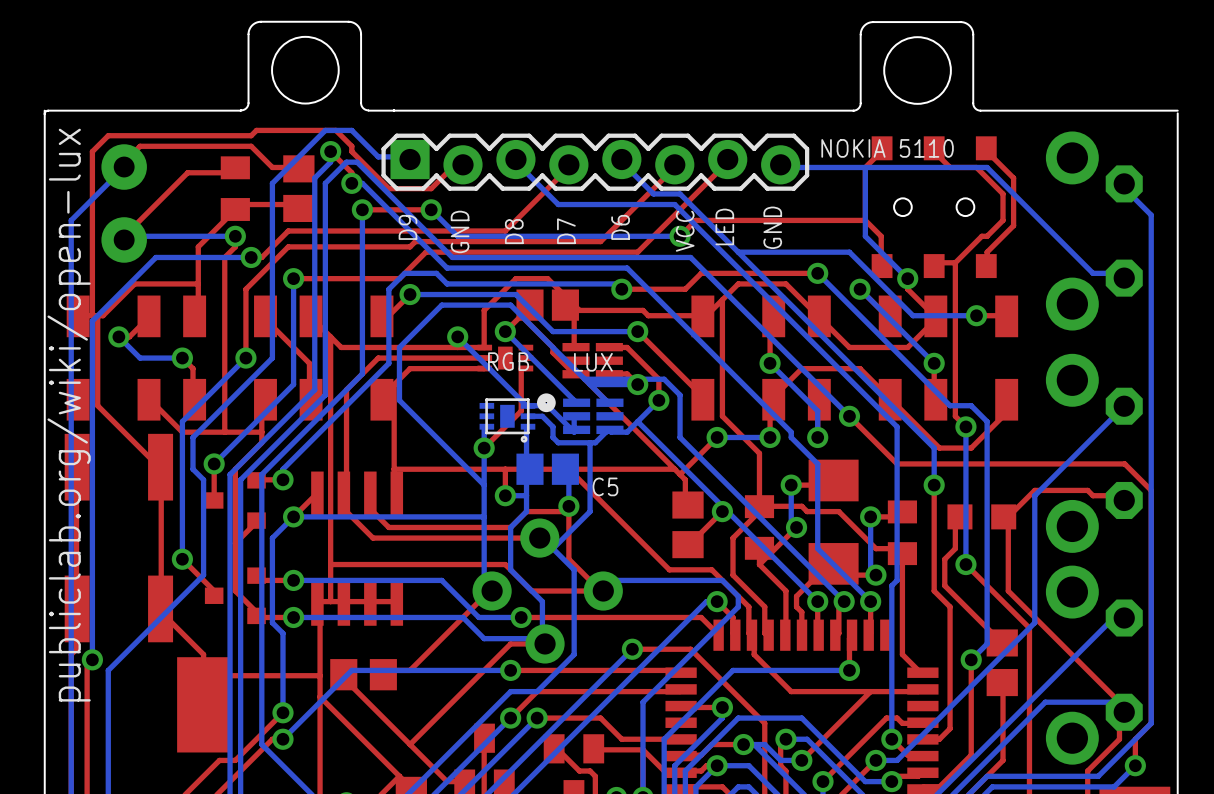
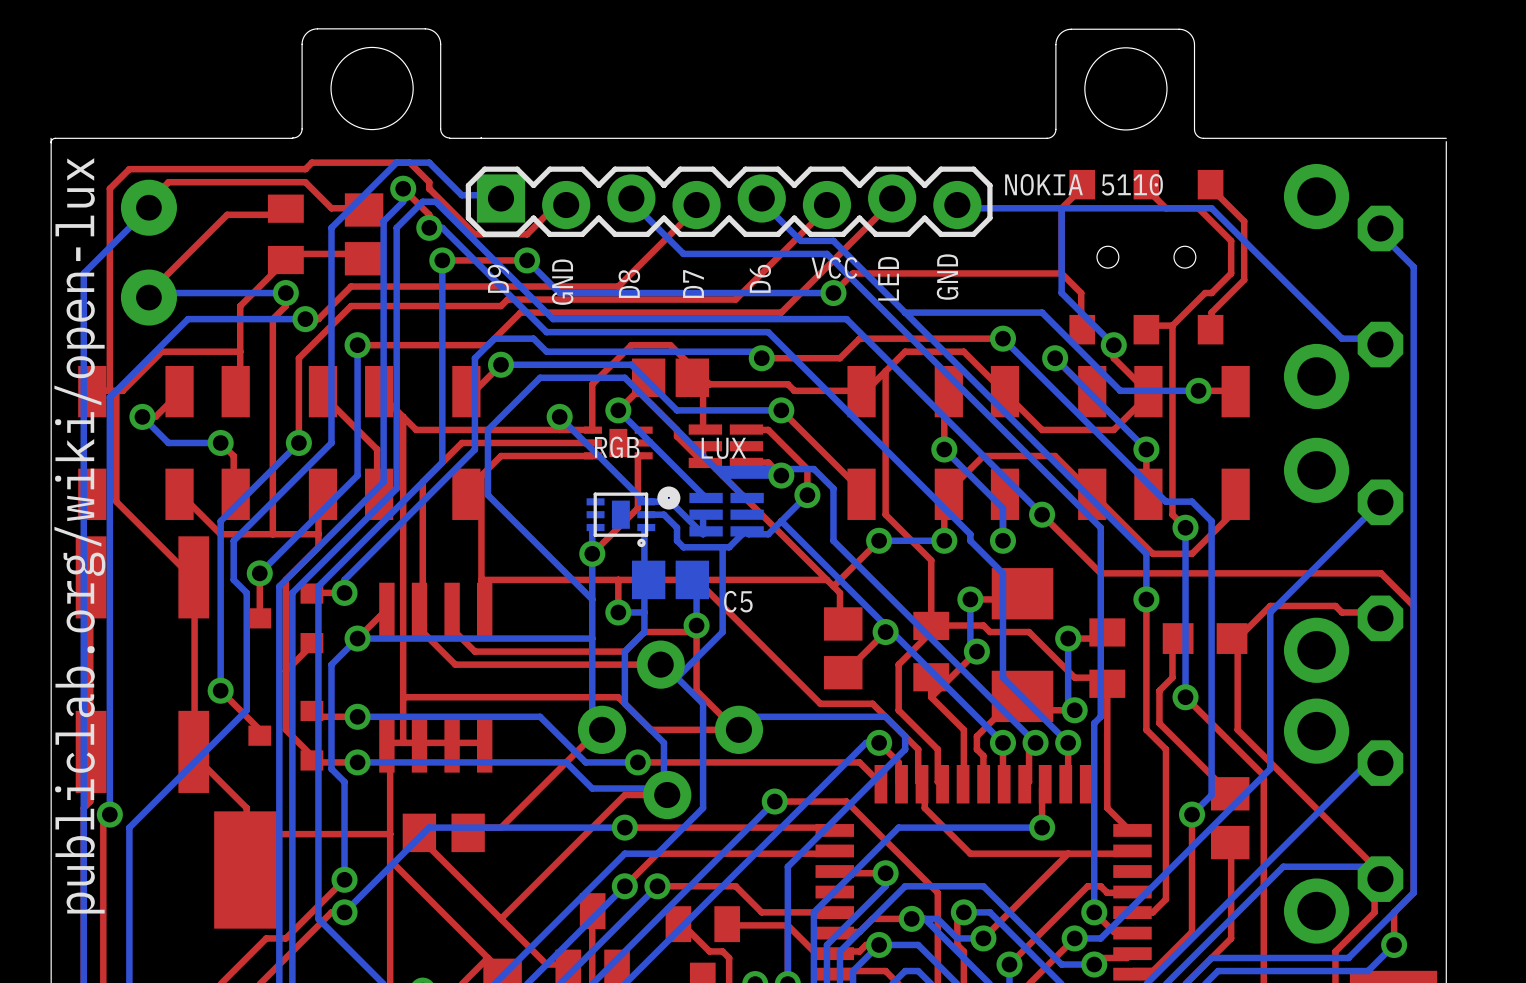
text rotation: 0° (685, 231) -> 90° clockwise (834, 267)

